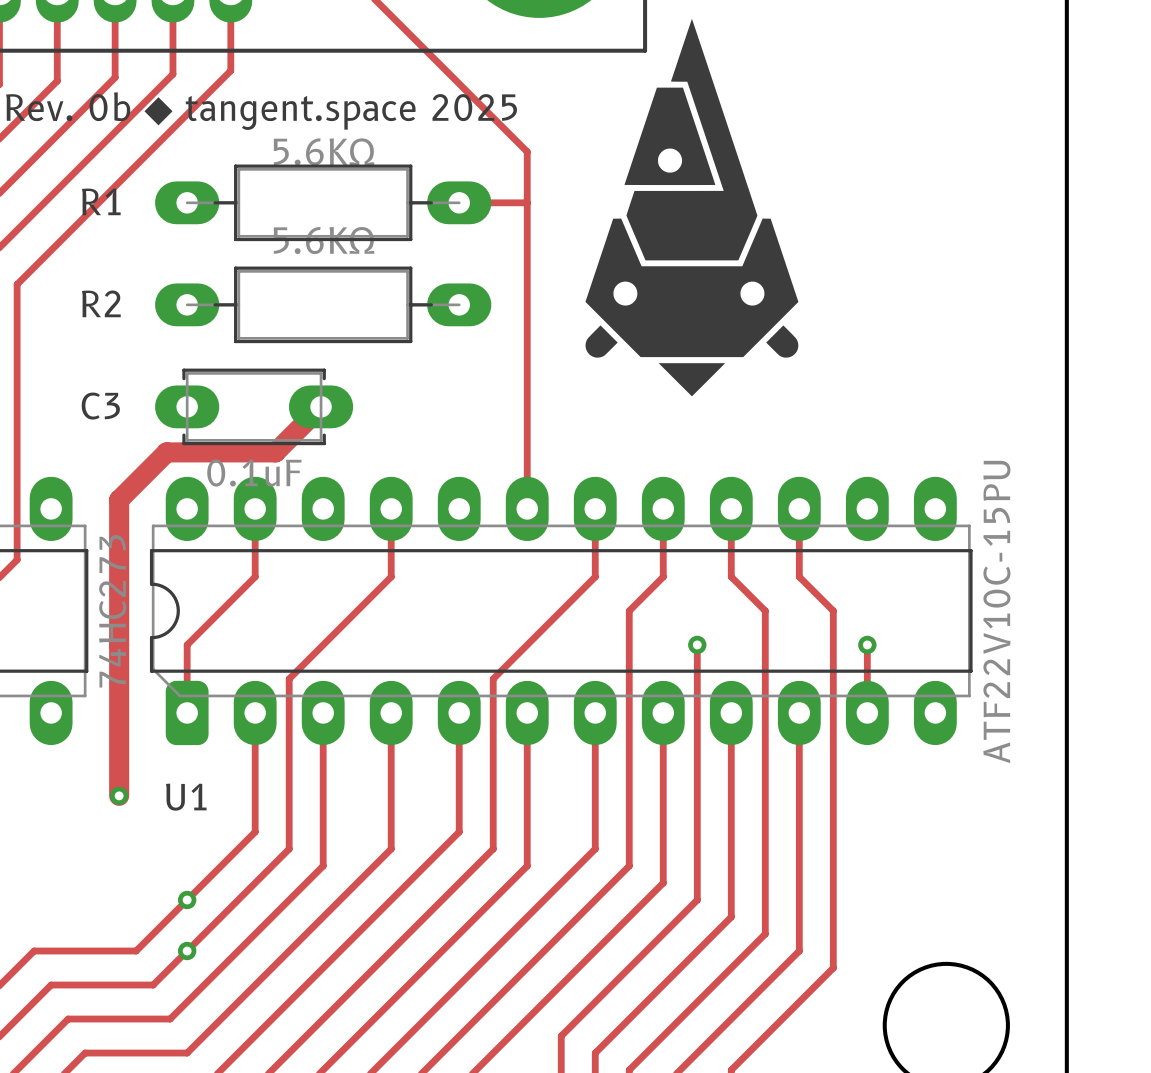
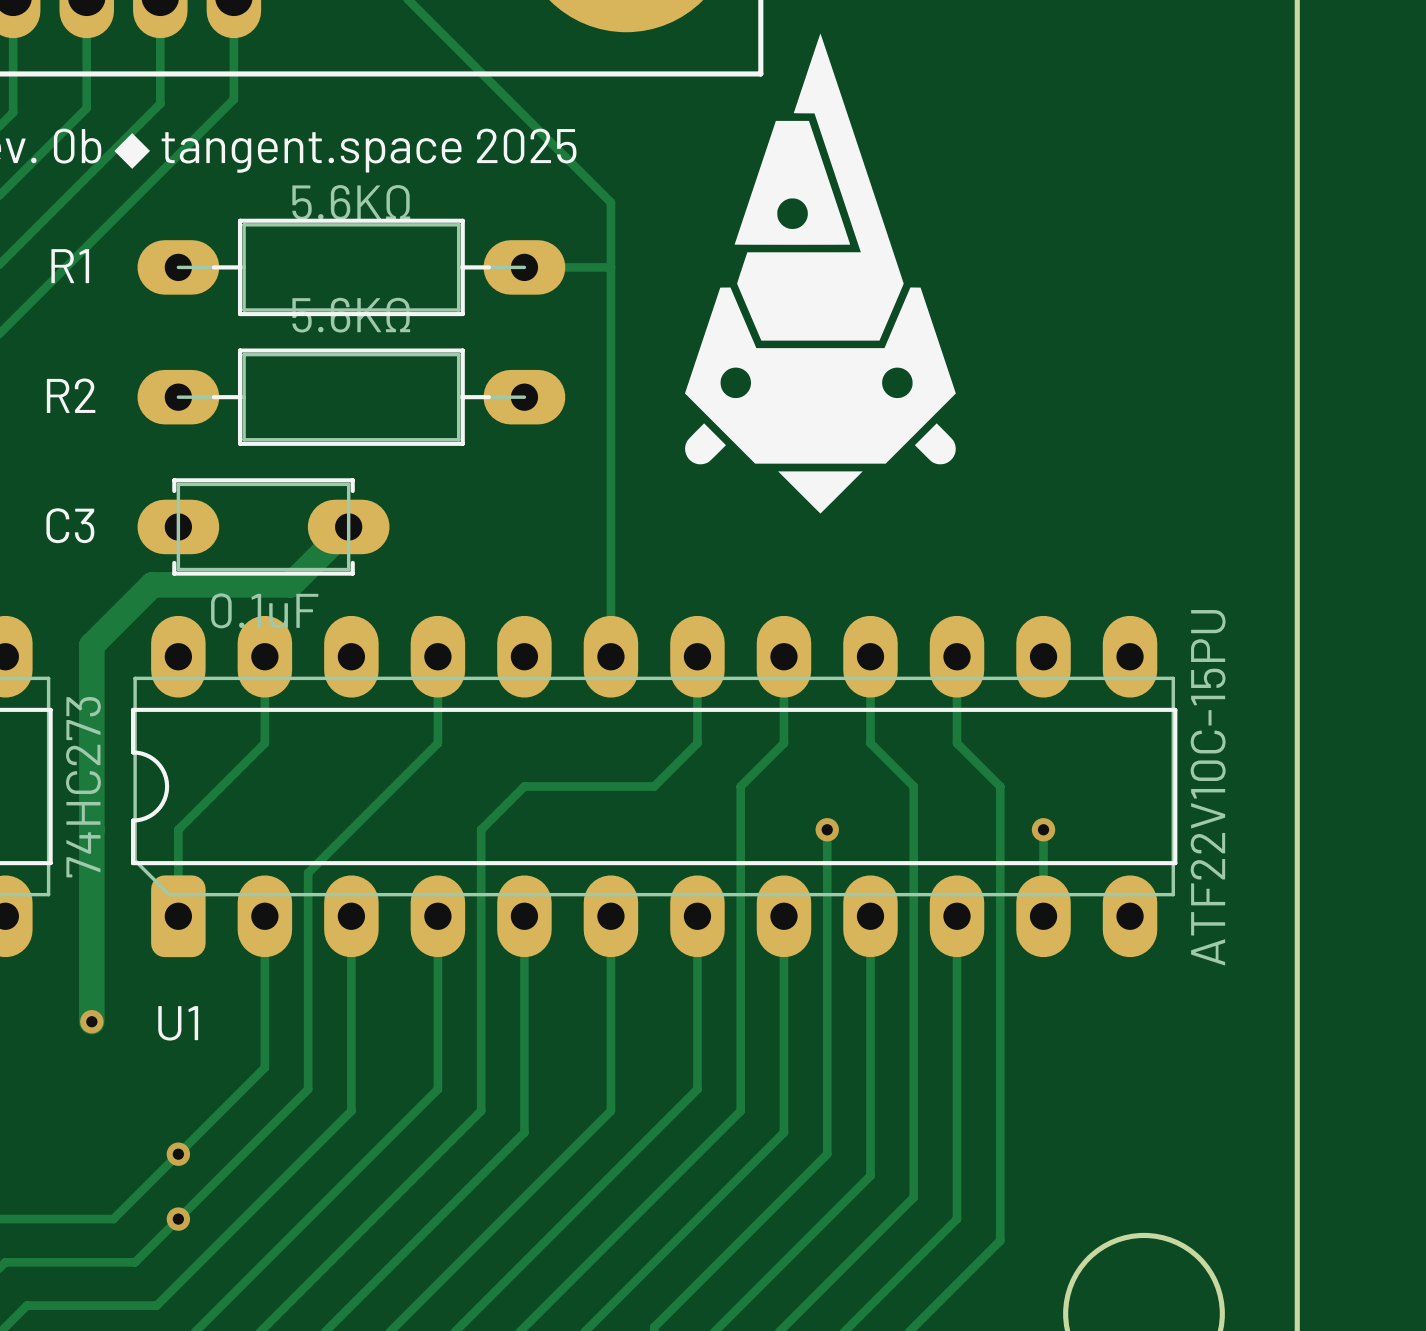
track: (561, 610) (493, 678) (493, 848) (459, 883) -> (654, 786) (524, 786) (481, 829) (481, 1110)
track: (459, 831) (425, 865) -> (524, 1067) (524, 1132)

